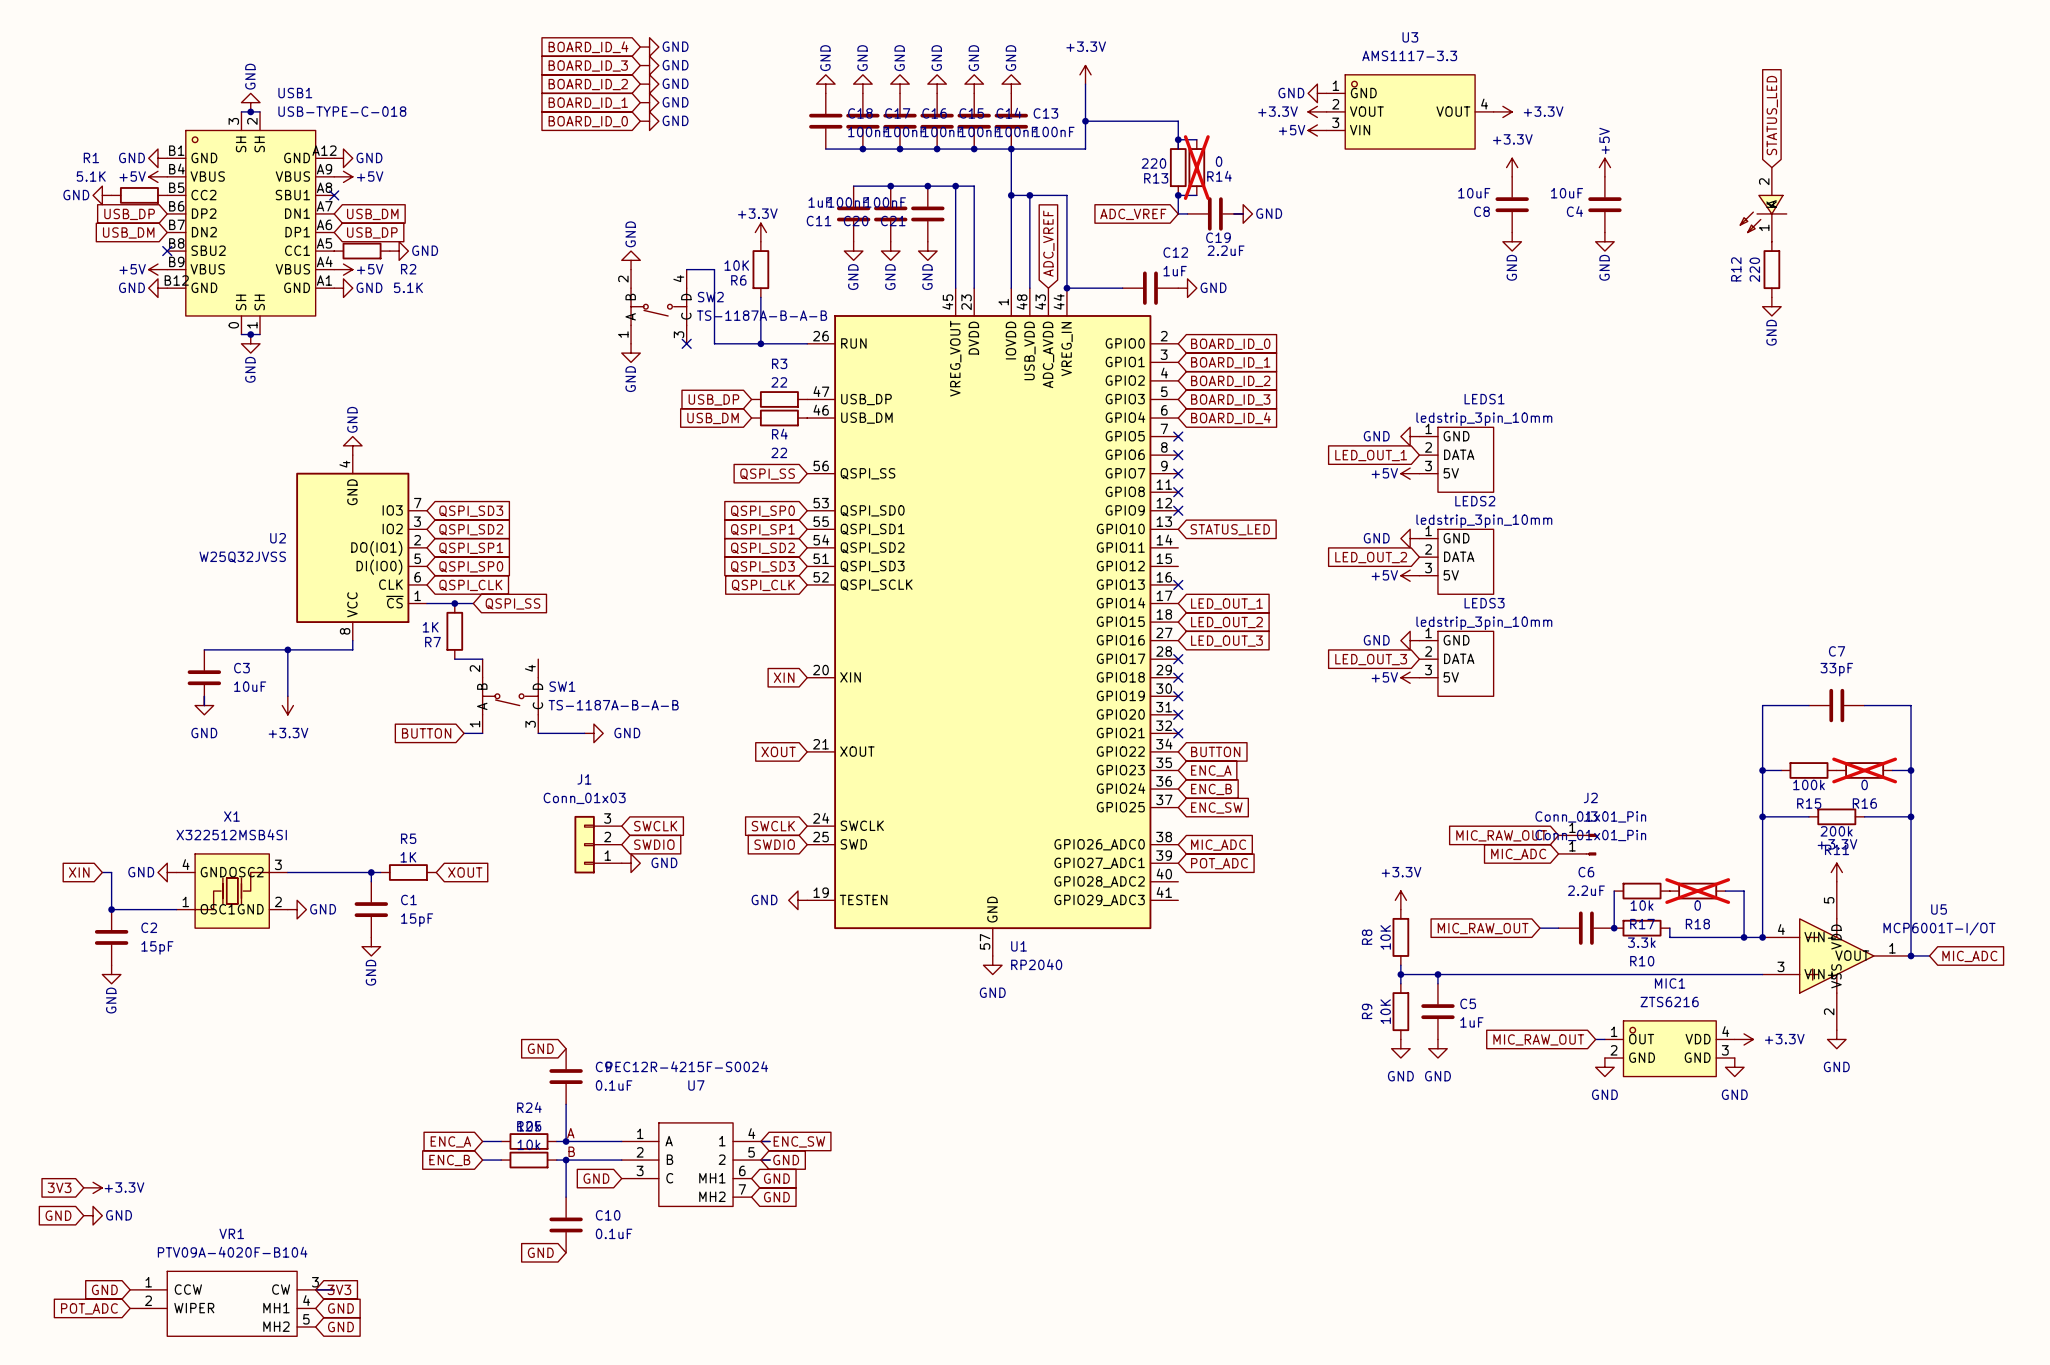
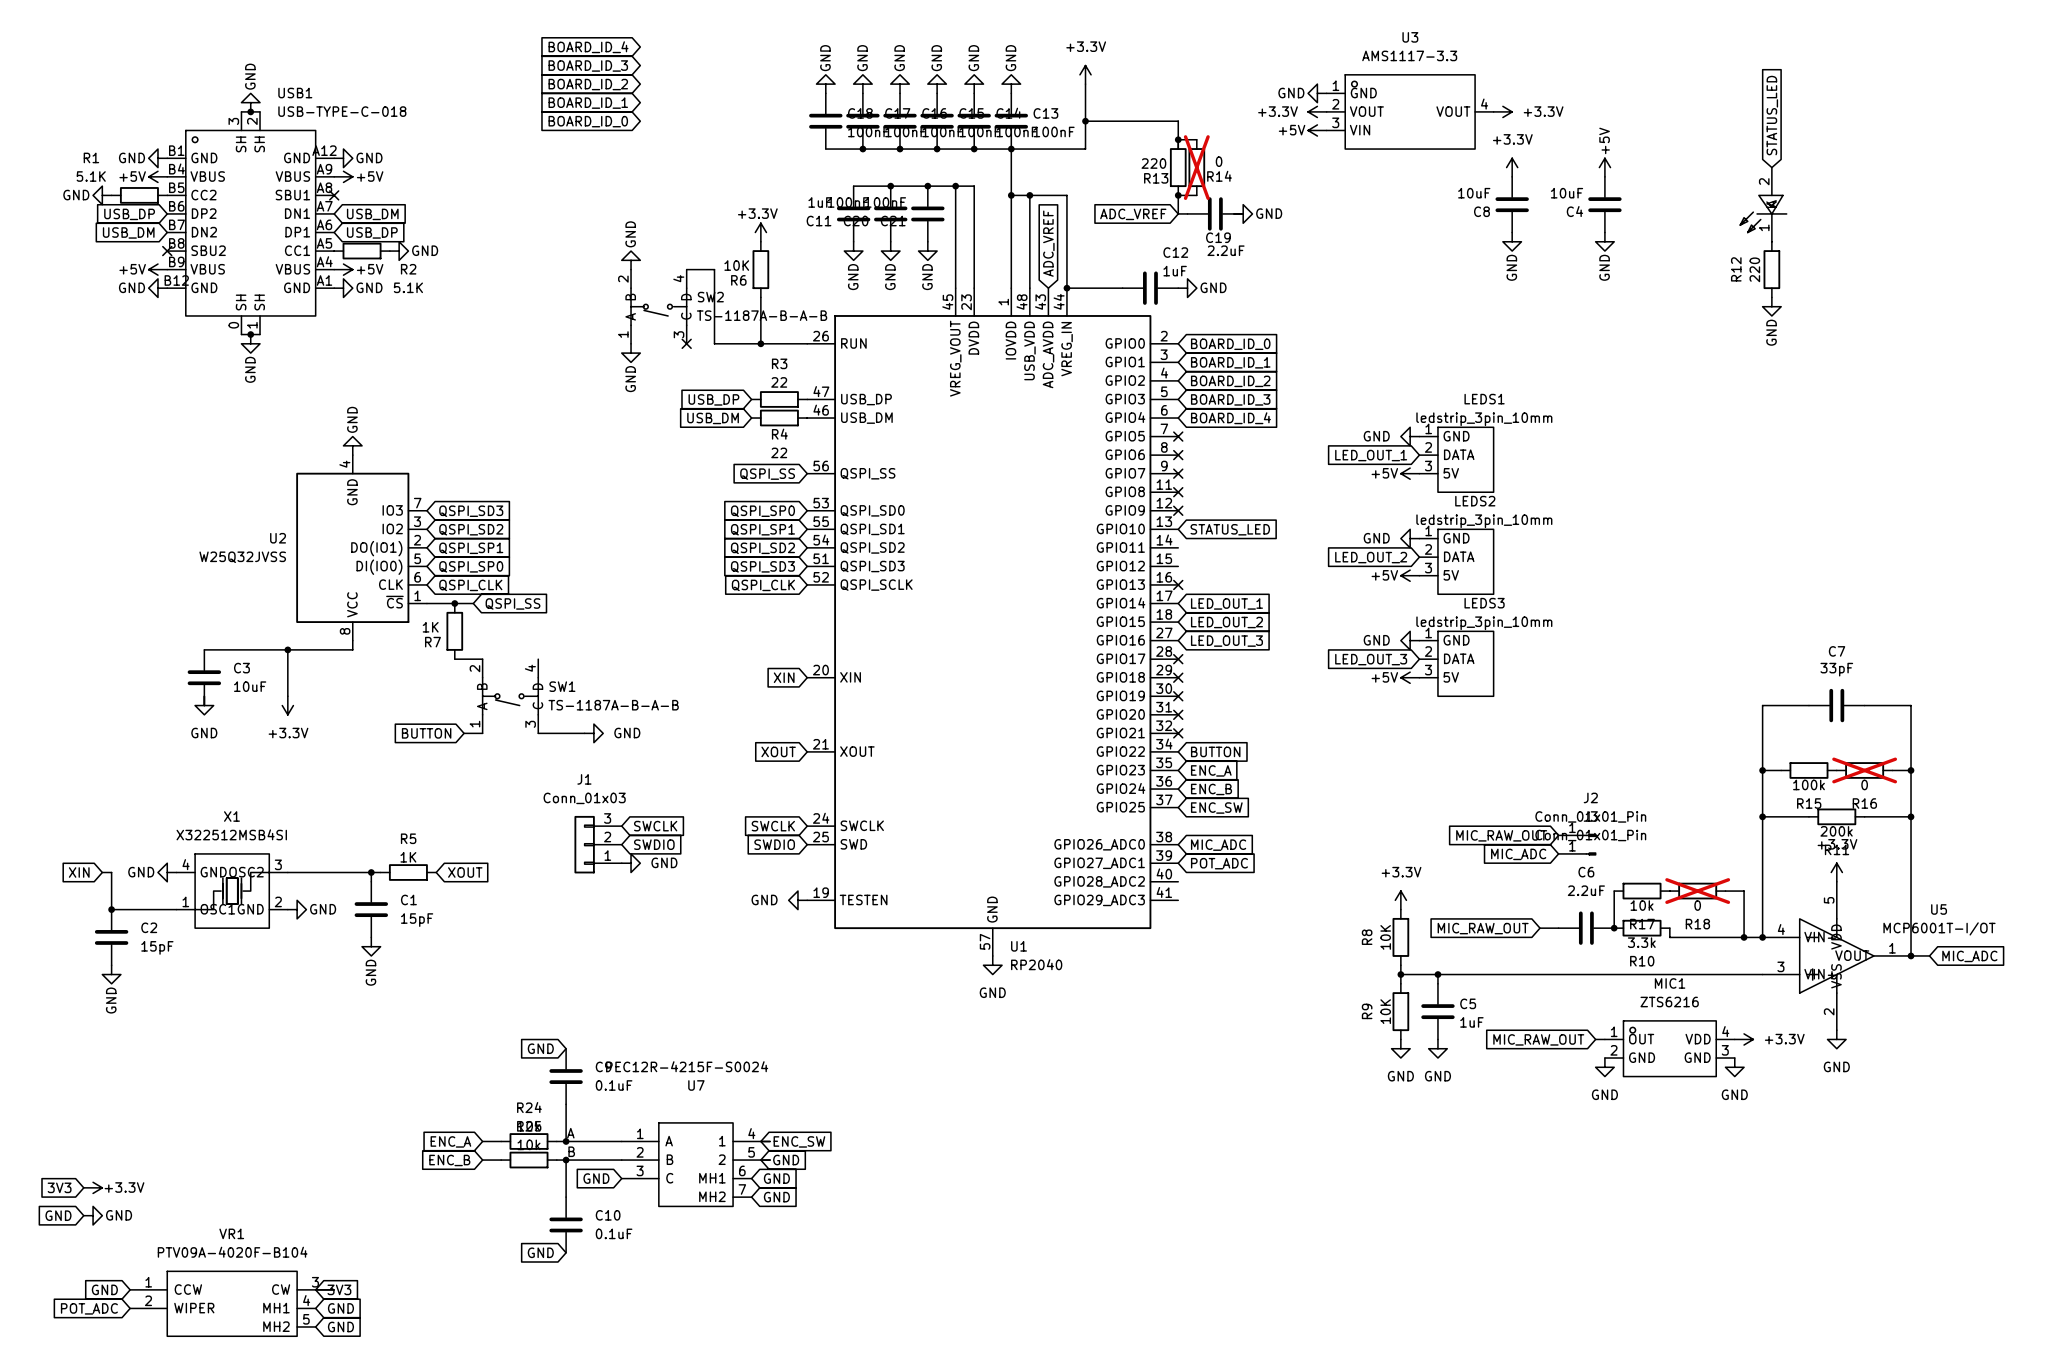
power symbol: GND (649, 47) -> none
power symbol: GND (649, 65) -> none
power symbol: GND (649, 84) -> none
power symbol: GND (649, 102) -> none
power symbol: GND (649, 121) -> none

